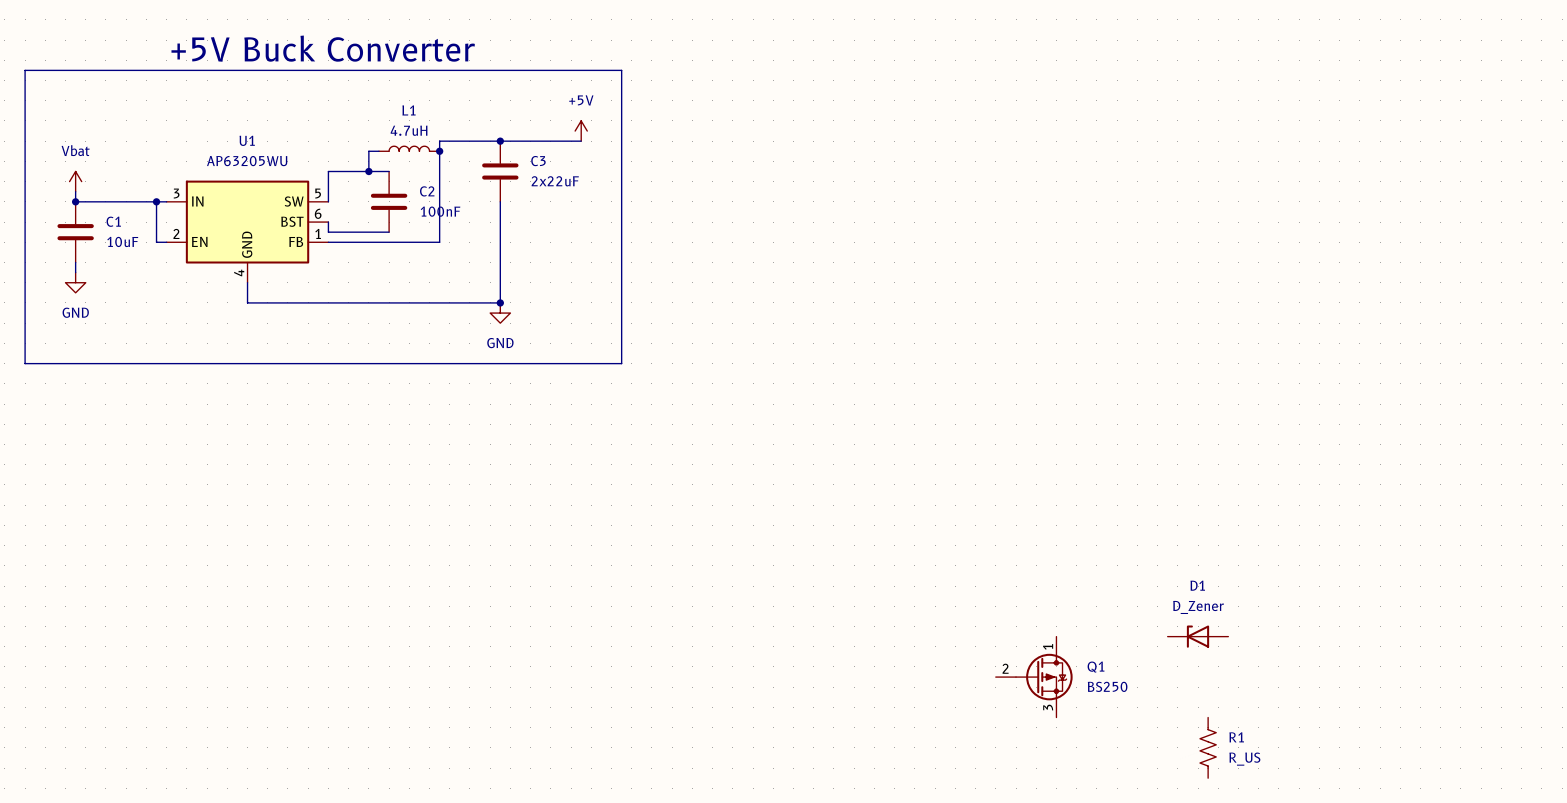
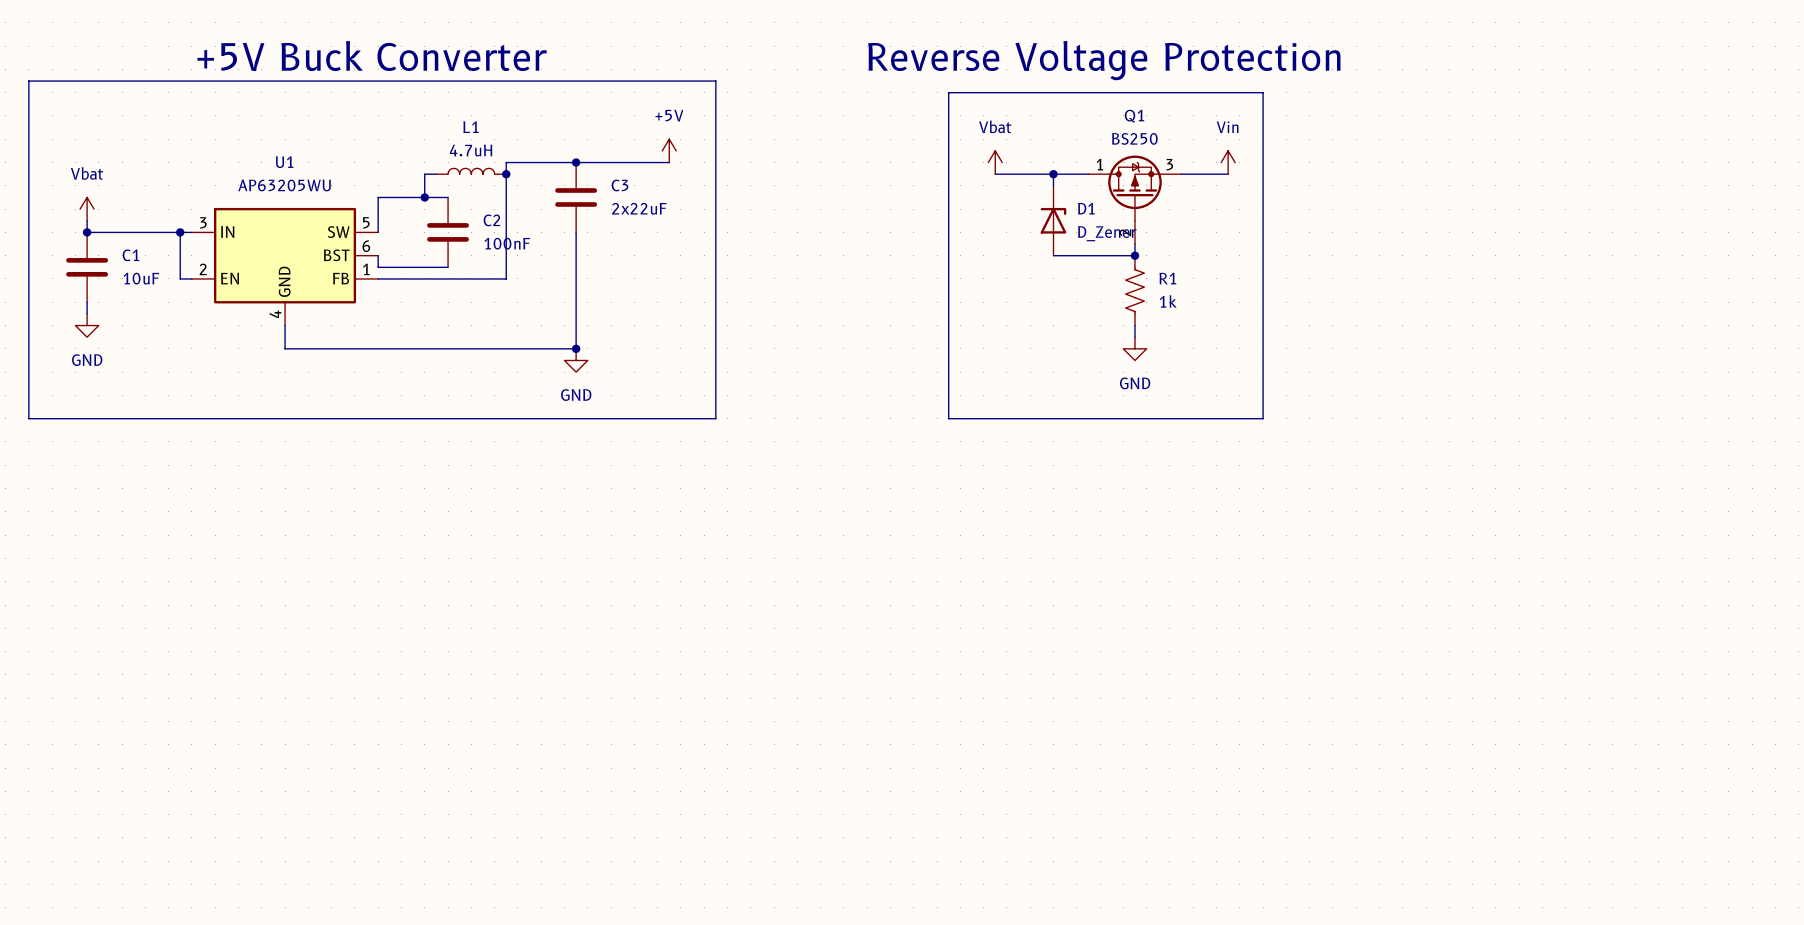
text: none -> Reverse Voltage Protection (1104, 60)
line: none -> (948, 92) (1263, 92) (1263, 418) (948, 418) (948, 92)
power symbol: none -> Vbat (995, 162)
power symbol: none -> Vin (1228, 162)
wire: none -> (995, 174) (1088, 174)
wire: none -> (1053, 174) (1053, 185)
junction: none -> (1053, 174)
wire: none -> (1181, 174) (1228, 174)
wire: none -> (1134, 244) (1134, 255) (1053, 255)
junction: none -> (1134, 255)
wire: none -> (1134, 325) (1134, 337)
power symbol: none -> GND (1134, 348)
D1 name position: D1 (1197, 585) -> D1 (1086, 208)
D1 value position: D_Zener (1198, 607) -> D_Zener (1107, 233)
D1 rotation: 0° (1198, 636) -> 90° clockwise (1053, 220)
D1 position: (1198, 636) -> (1053, 220)
Q1 position: (1034, 677) -> (1134, 199)
Q1 rotation: 0° (1044, 677) -> 90° counterclockwise (1134, 188)
Q1 value position: BS250 (1107, 686) -> BS250 (1134, 138)
R1 position: (1208, 747) -> (1134, 290)
R1 value: R_US (1244, 759) -> 1k (1168, 301)

